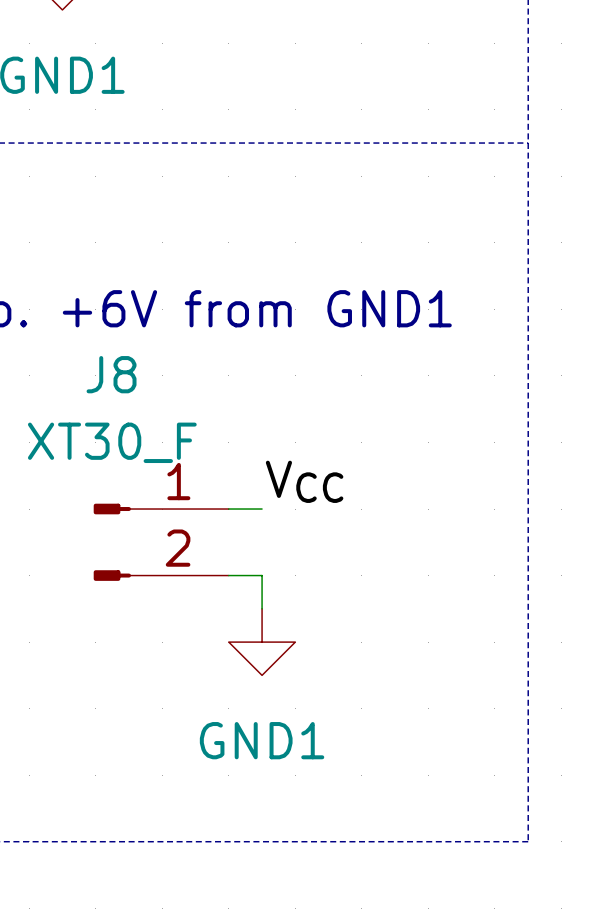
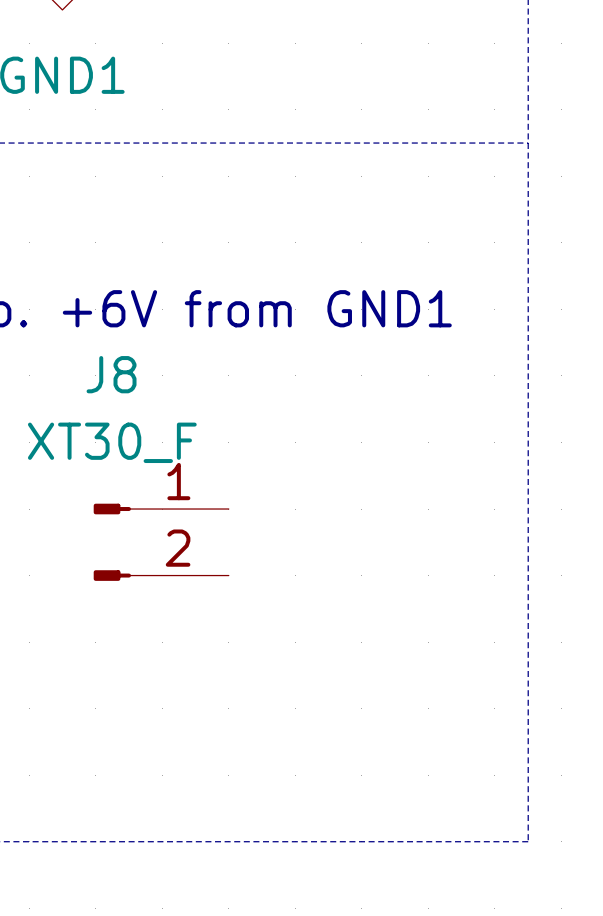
label: VCC (304, 481) -> none
wire: (228, 509) (262, 509) -> none
wire: (228, 575) (262, 575) (262, 608) -> none
power symbol: GND1 (262, 642) -> none

